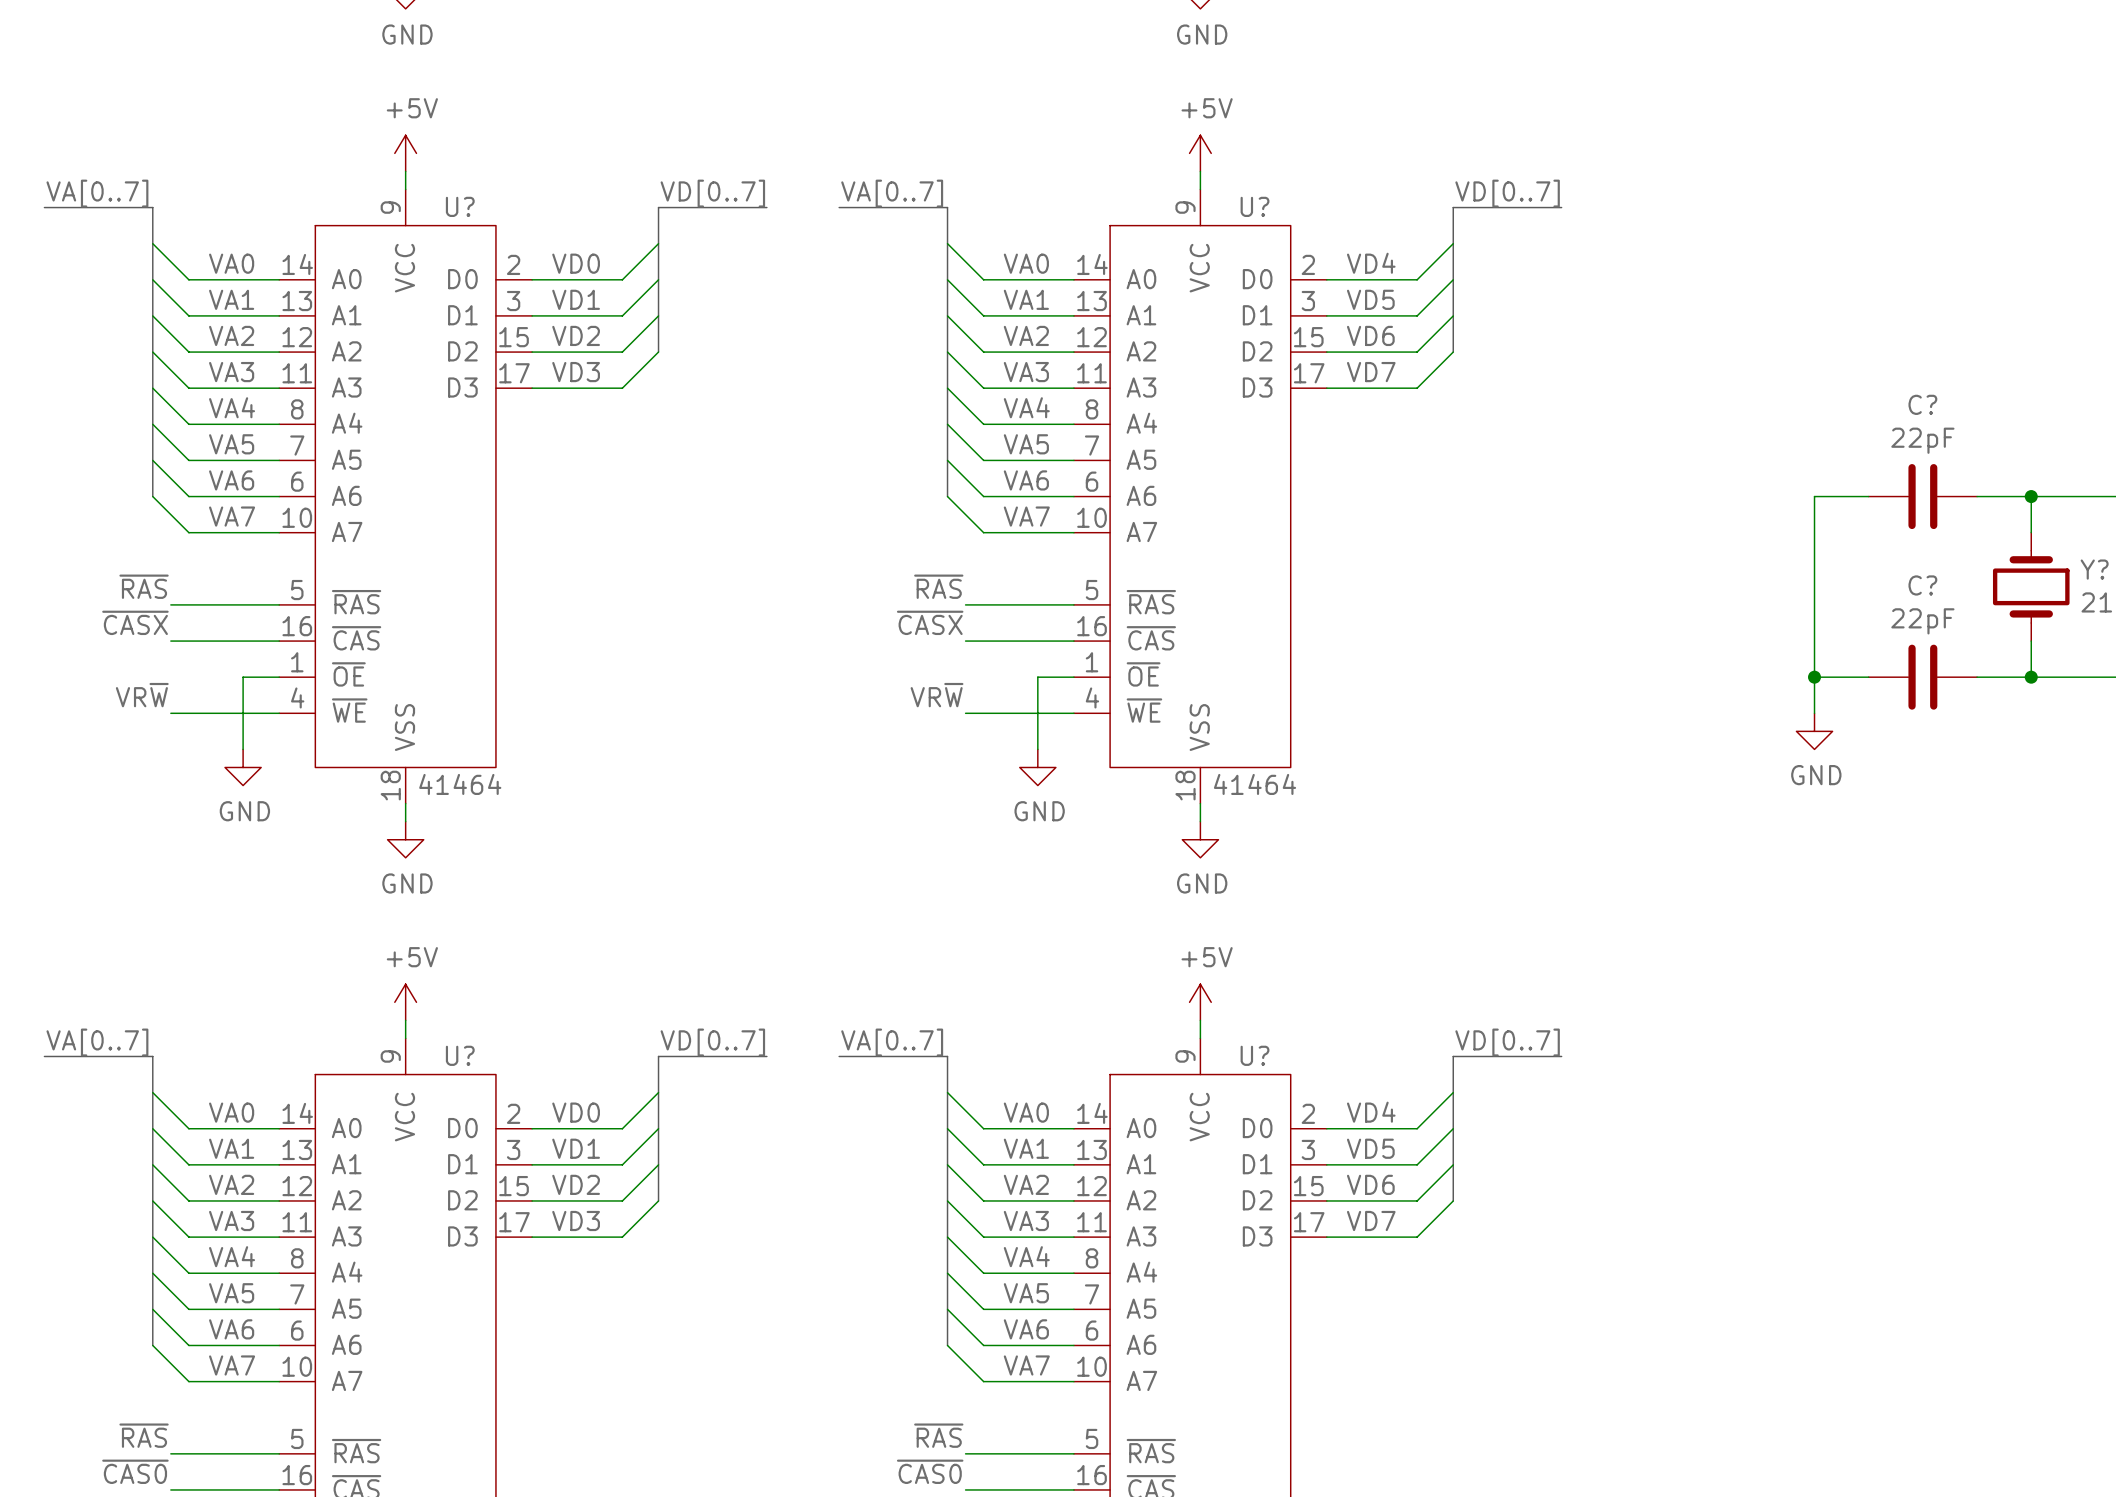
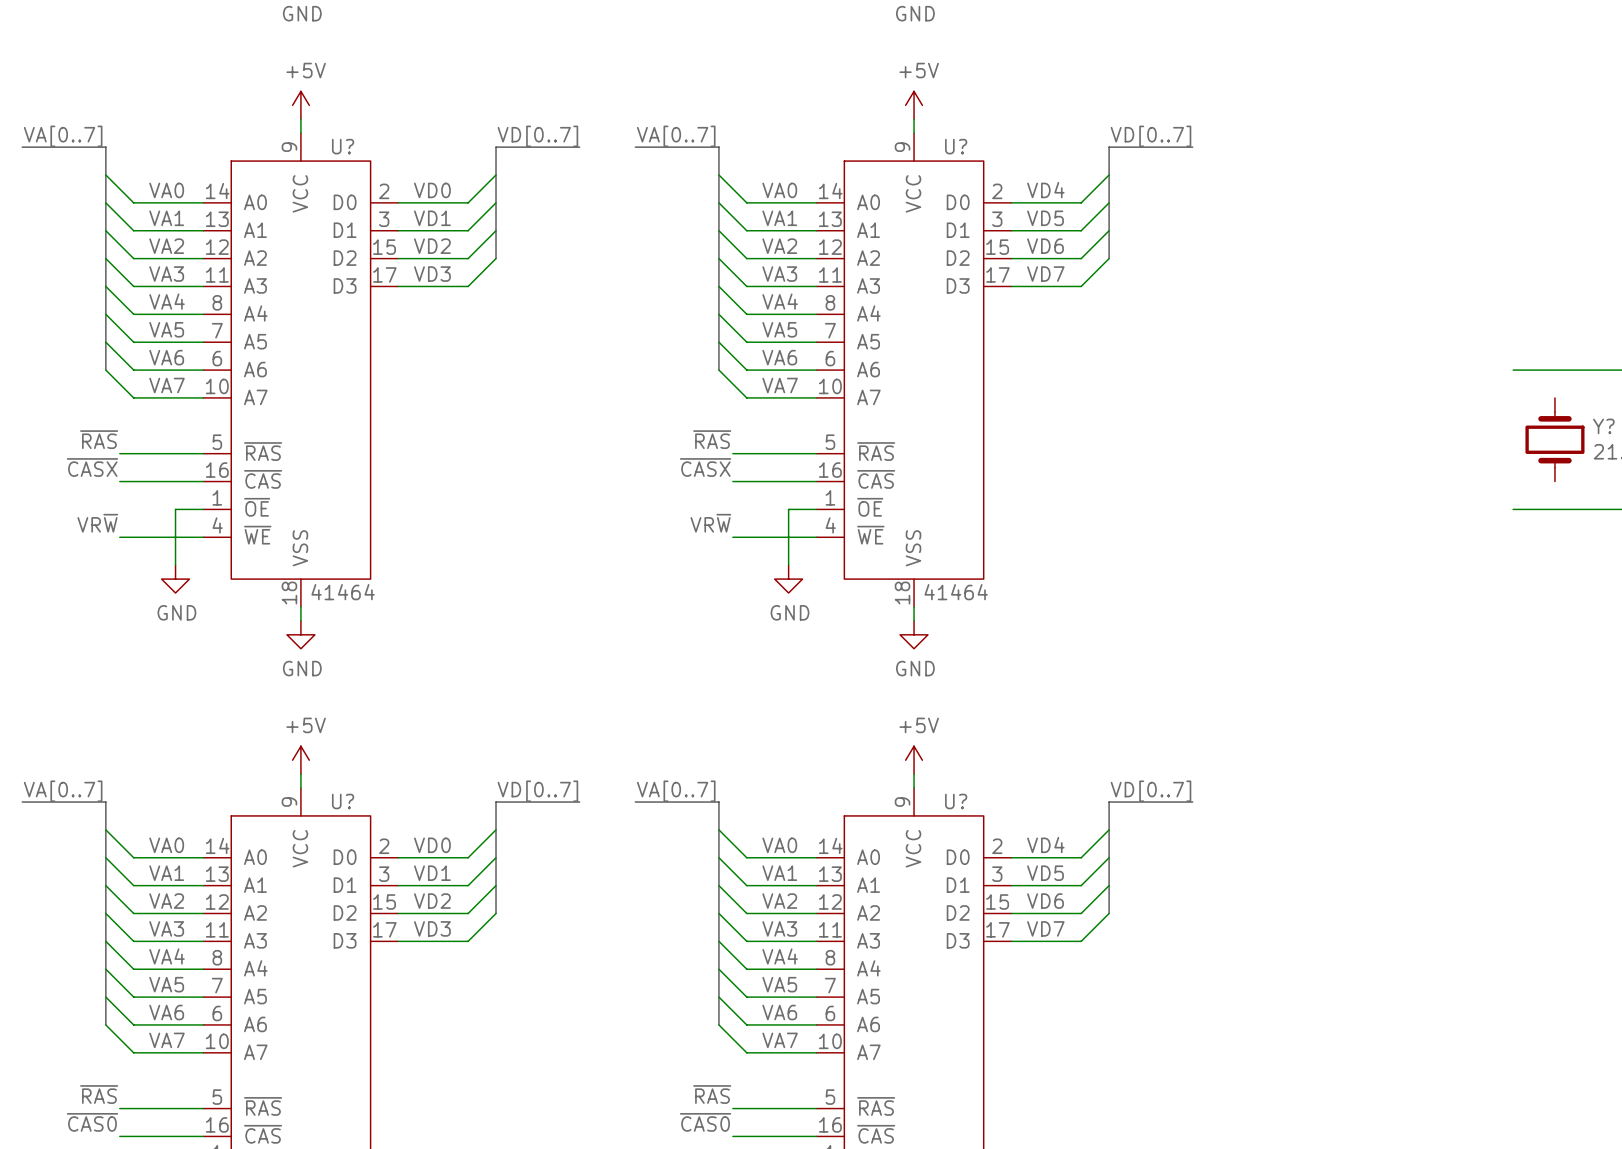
wire: (1868, 496) (1814, 496) (1814, 713) -> none
C?: 22pF (1922, 496) -> none
wire: (2031, 496) (2031, 532) -> none
junction: (2031, 496) -> none
wire: (2031, 641) (2031, 677) -> none
wire: (1814, 677) (1868, 677) -> none
junction: (1814, 677) -> none
C?: 22pF (1922, 677) -> none
junction: (2031, 677) -> none
power symbol: GND (1814, 731) -> none

